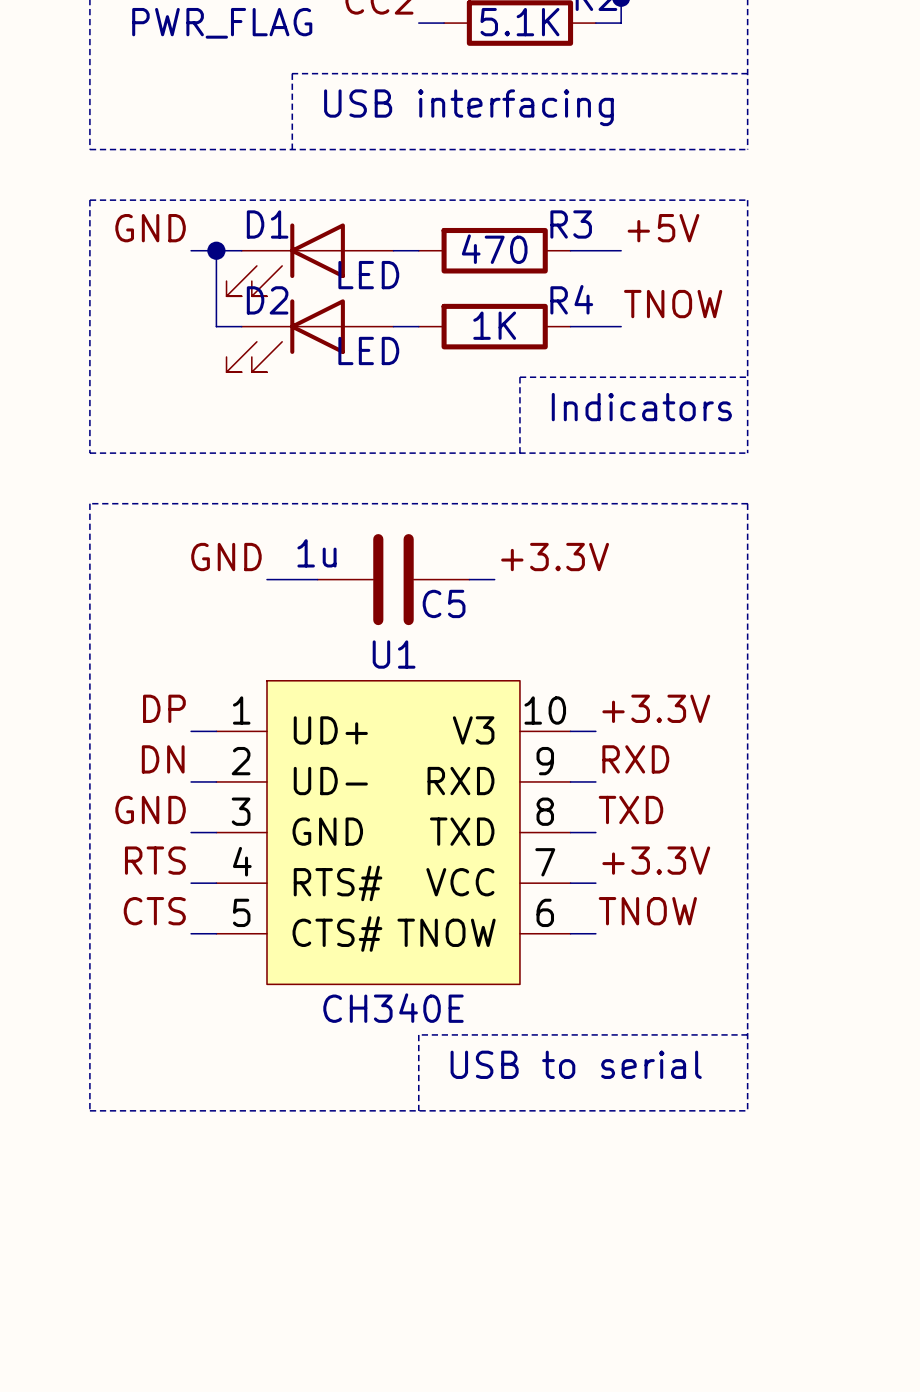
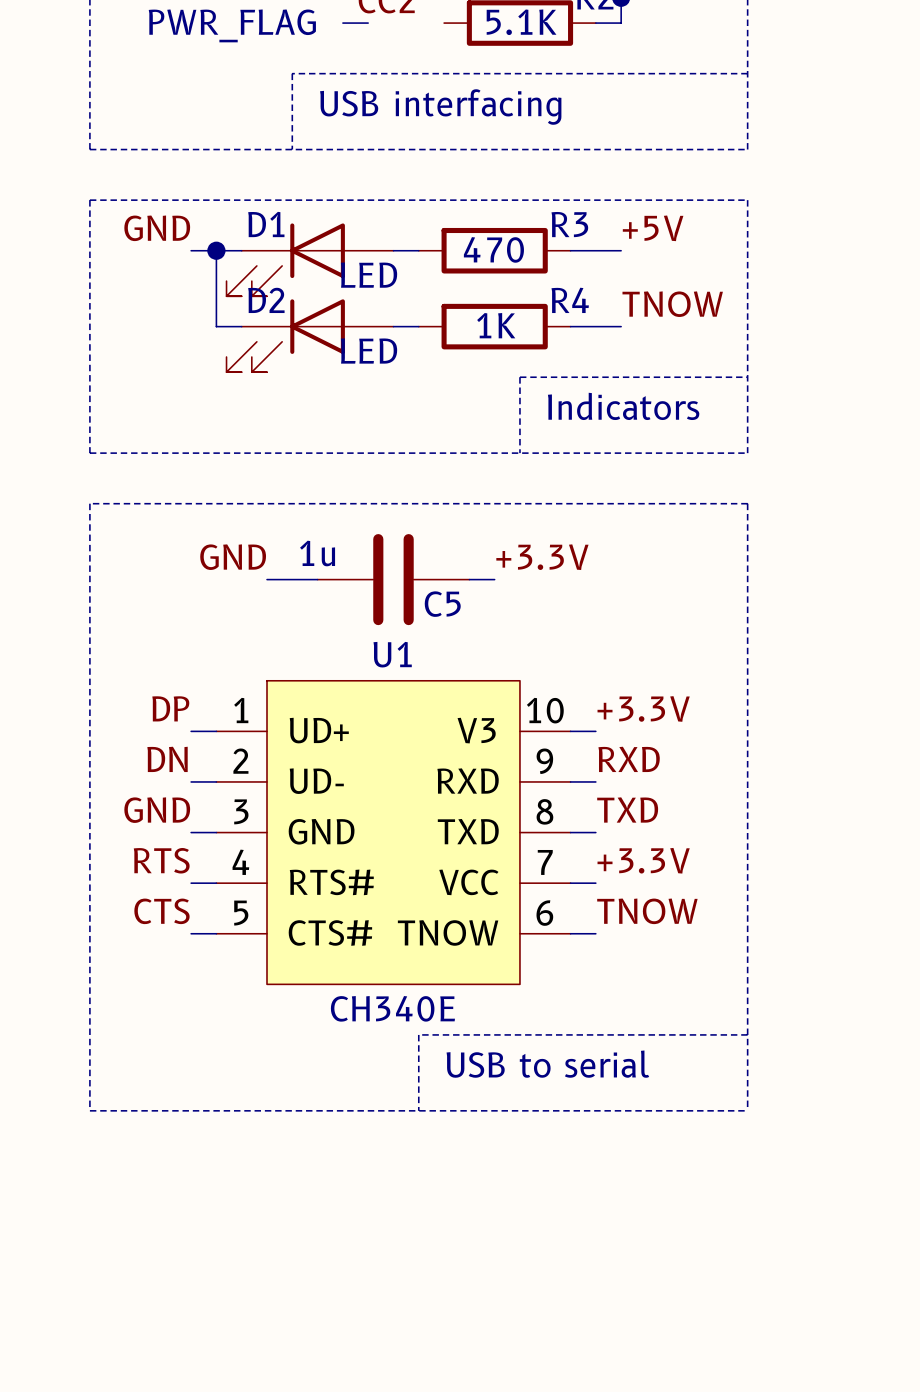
wire: (418, 23) (444, 23) -> (342, 23) (368, 23)

